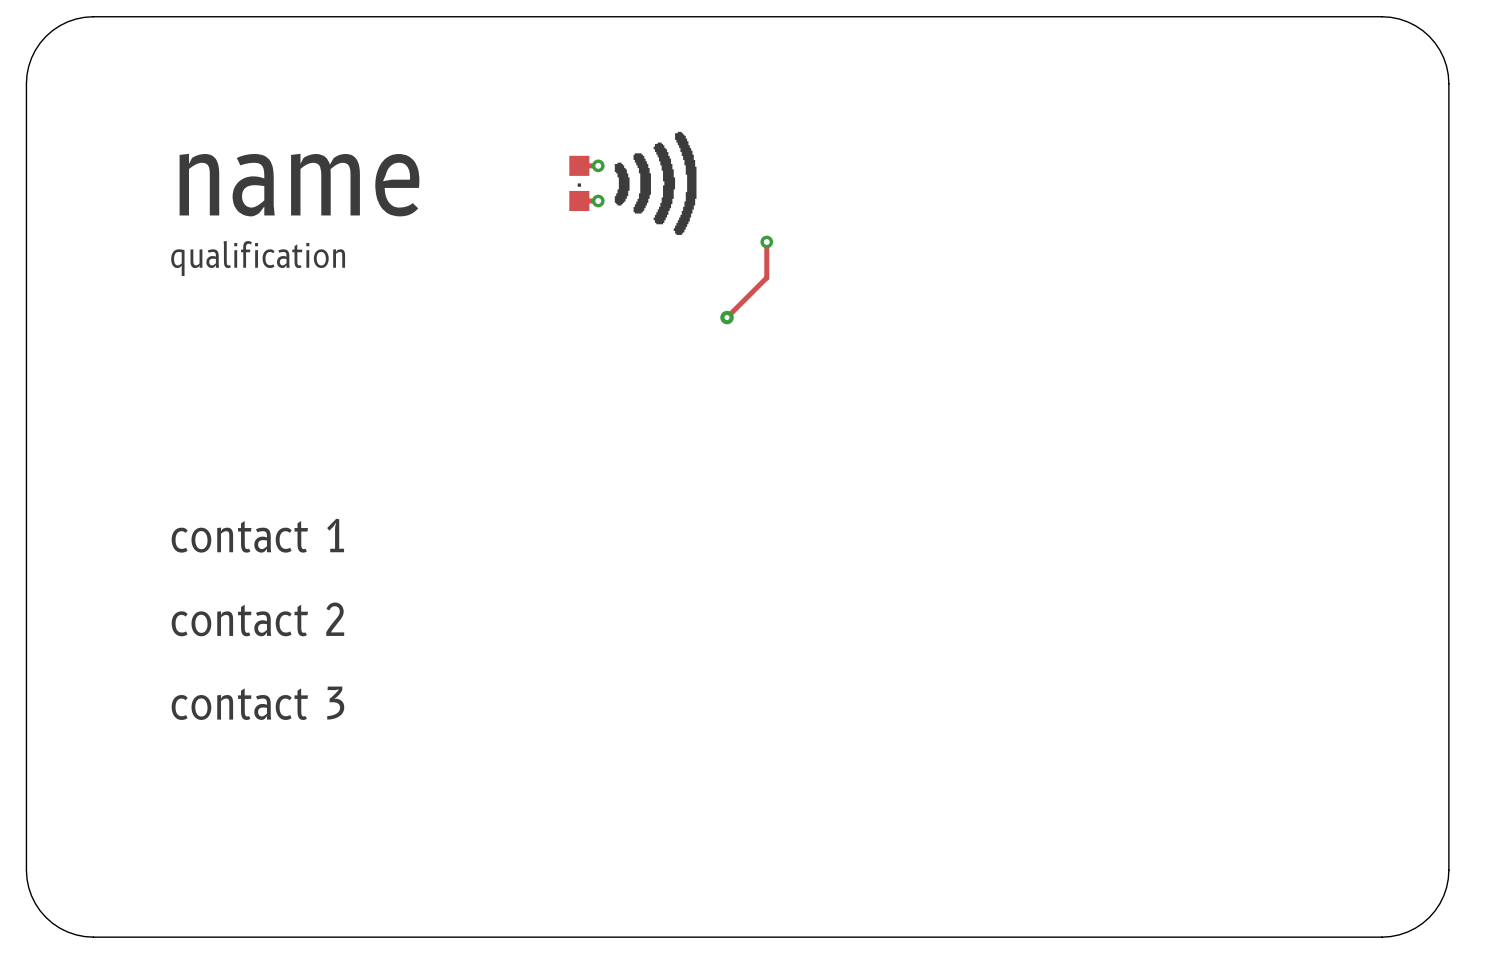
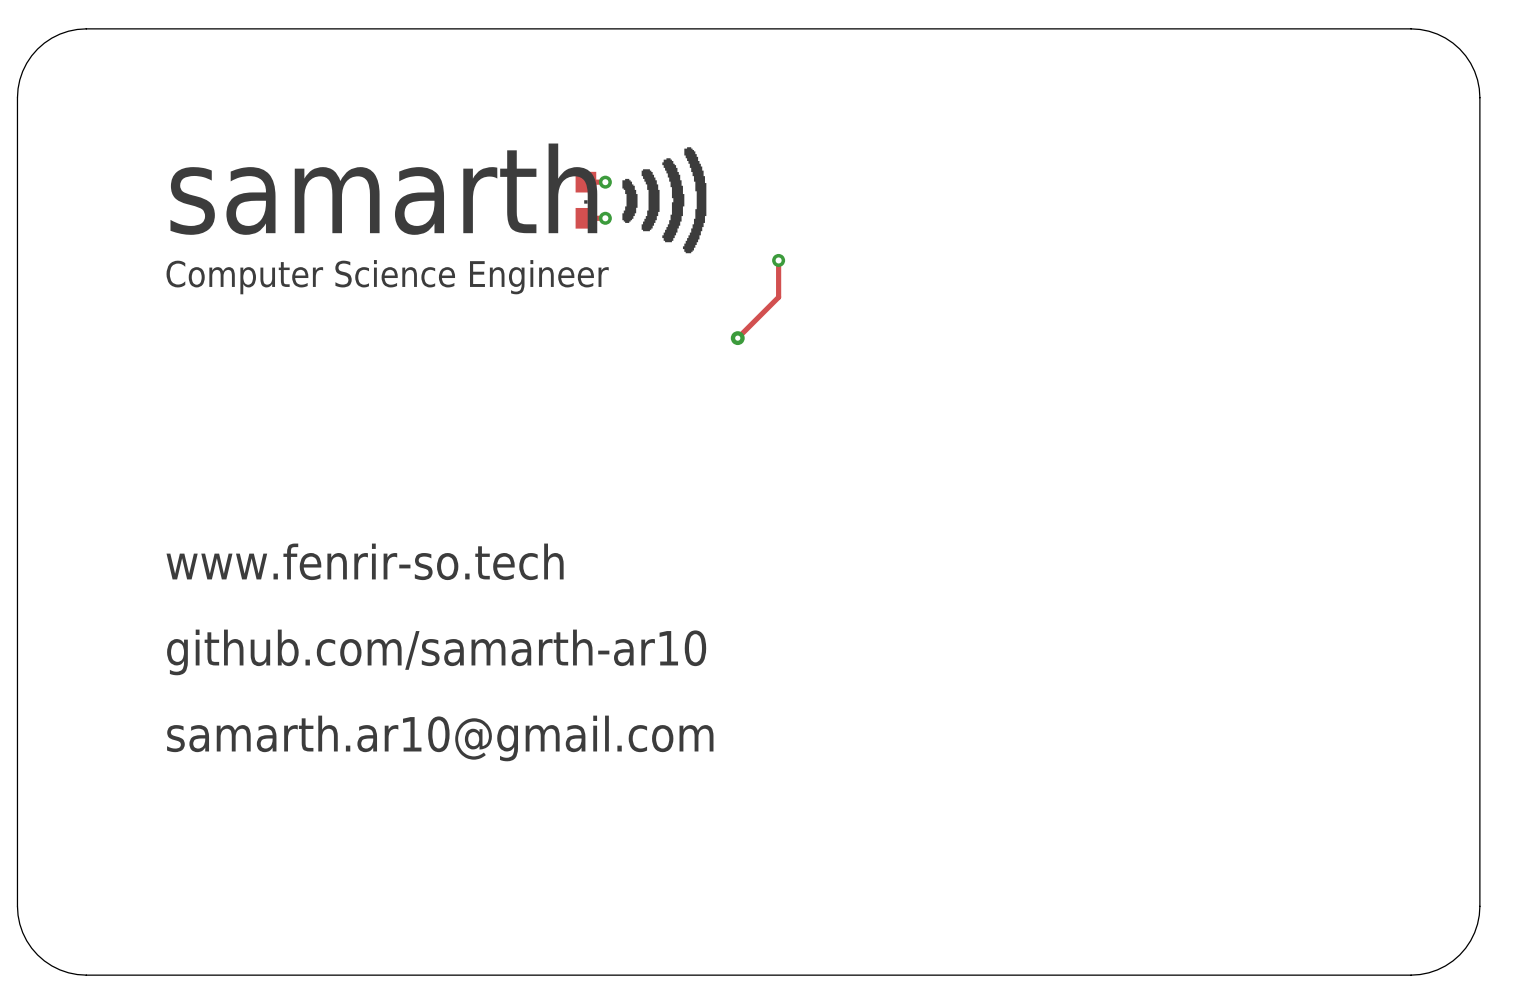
text: name (299, 185) -> samarth (383, 189)
text: qualification (258, 258) -> Computer Science Engineer (387, 277)
text: contact 1 (257, 535) -> www.fenrir-so.tech (365, 561)
text: contact 2 (257, 619) -> github.com/samarth-ar10 (436, 652)
text: contact 3 (257, 703) -> samarth.ar10@gmail.com (440, 738)

